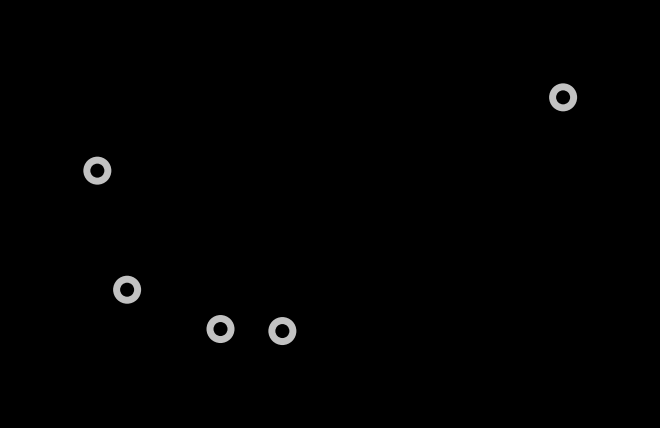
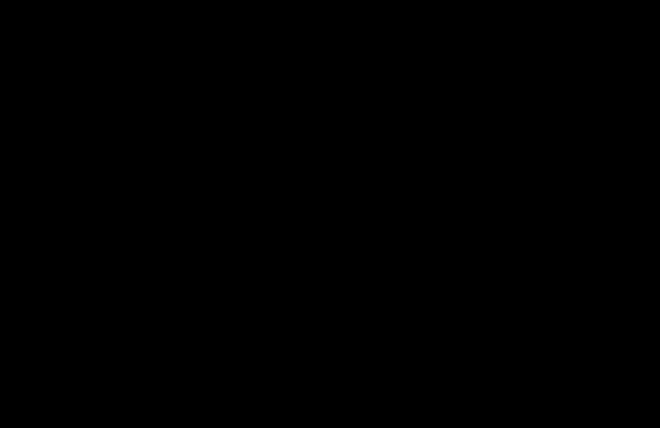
via: (563, 97) -> none
via: (97, 170) -> none
via: (127, 289) -> none
via: (220, 329) -> none
via: (282, 331) -> none

